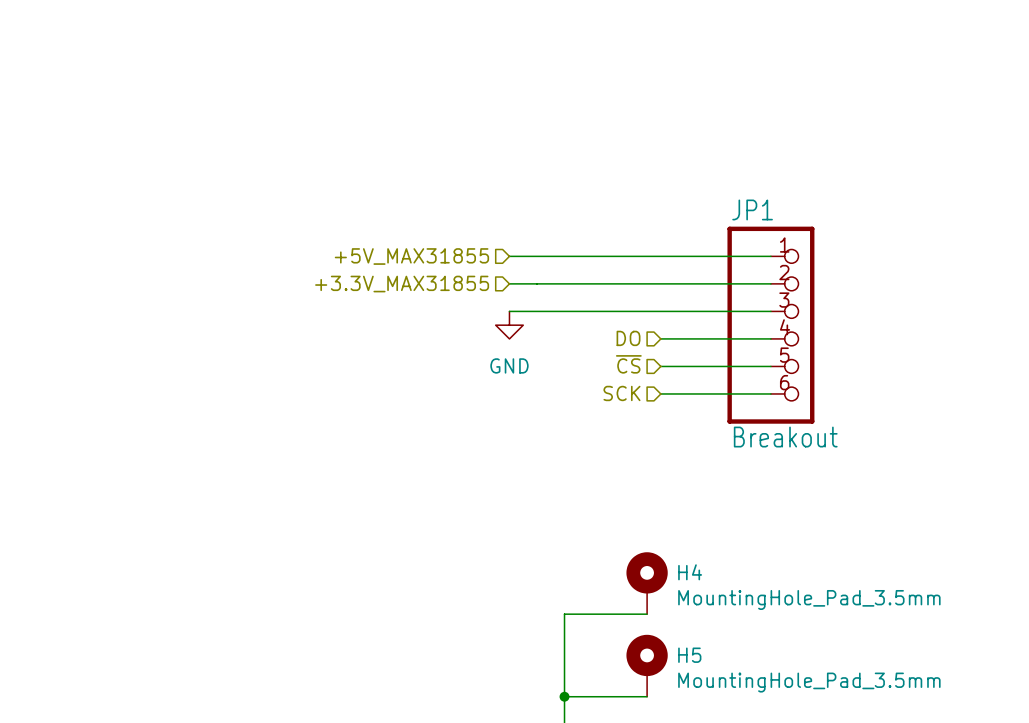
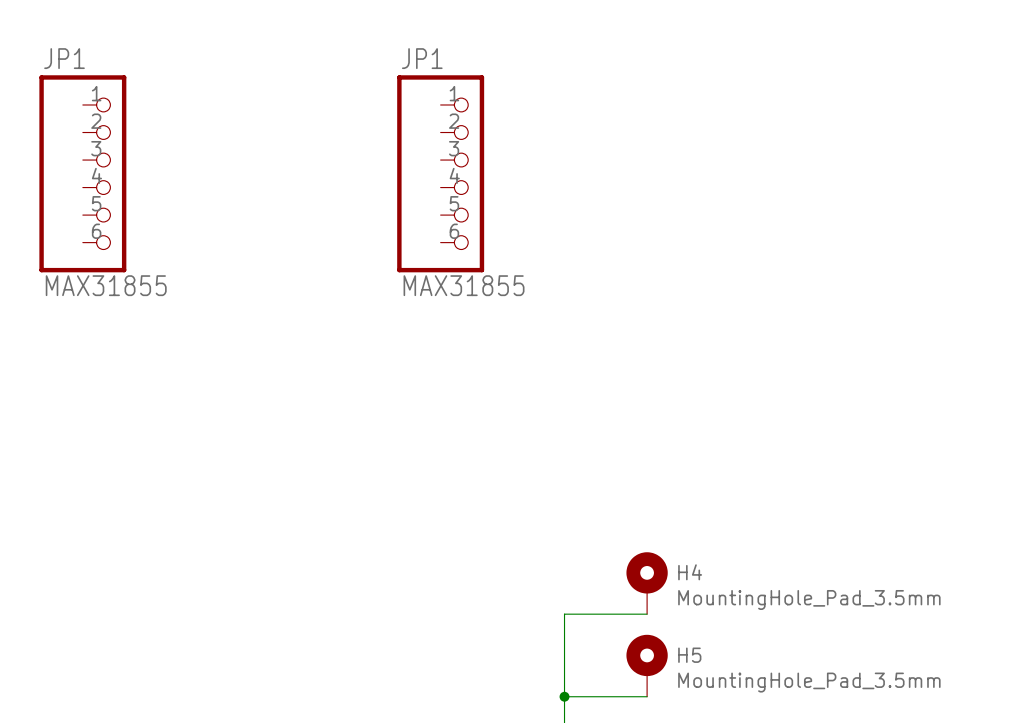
JP1: none -> MAX31855 (82, 173)
JP1: none -> MAX31855 (440, 173)
hierarchical label: +5V_MAX31855 (411, 256) -> none
wire: (509, 256) (770, 256) -> none
wire: (509, 283) (770, 283) -> none
hierarchical label: +3.3V_MAX31855 (402, 284) -> none
wire: (509, 311) (770, 311) -> none
power symbol: GND (509, 325) -> none
JP1: Breakout (770, 325) -> none
hierarchical label: DO (628, 338) -> none
wire: (660, 338) (770, 338) -> none
hierarchical label: ~{CS} (628, 364) -> none
wire: (660, 366) (770, 366) -> none
hierarchical label: SCK (621, 393) -> none
wire: (660, 393) (770, 393) -> none

